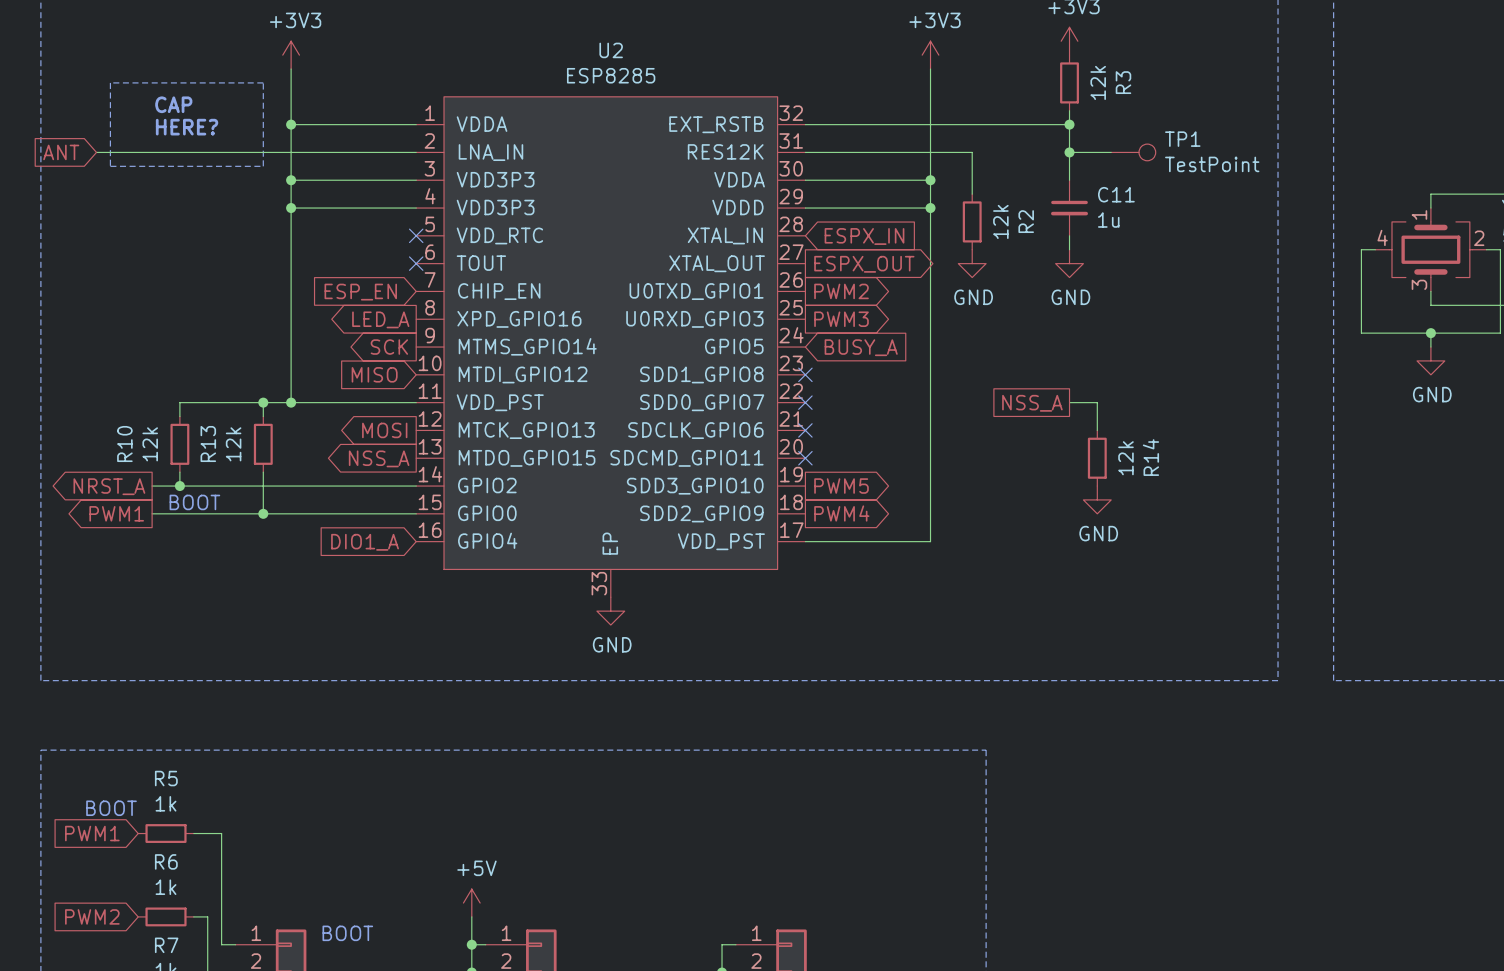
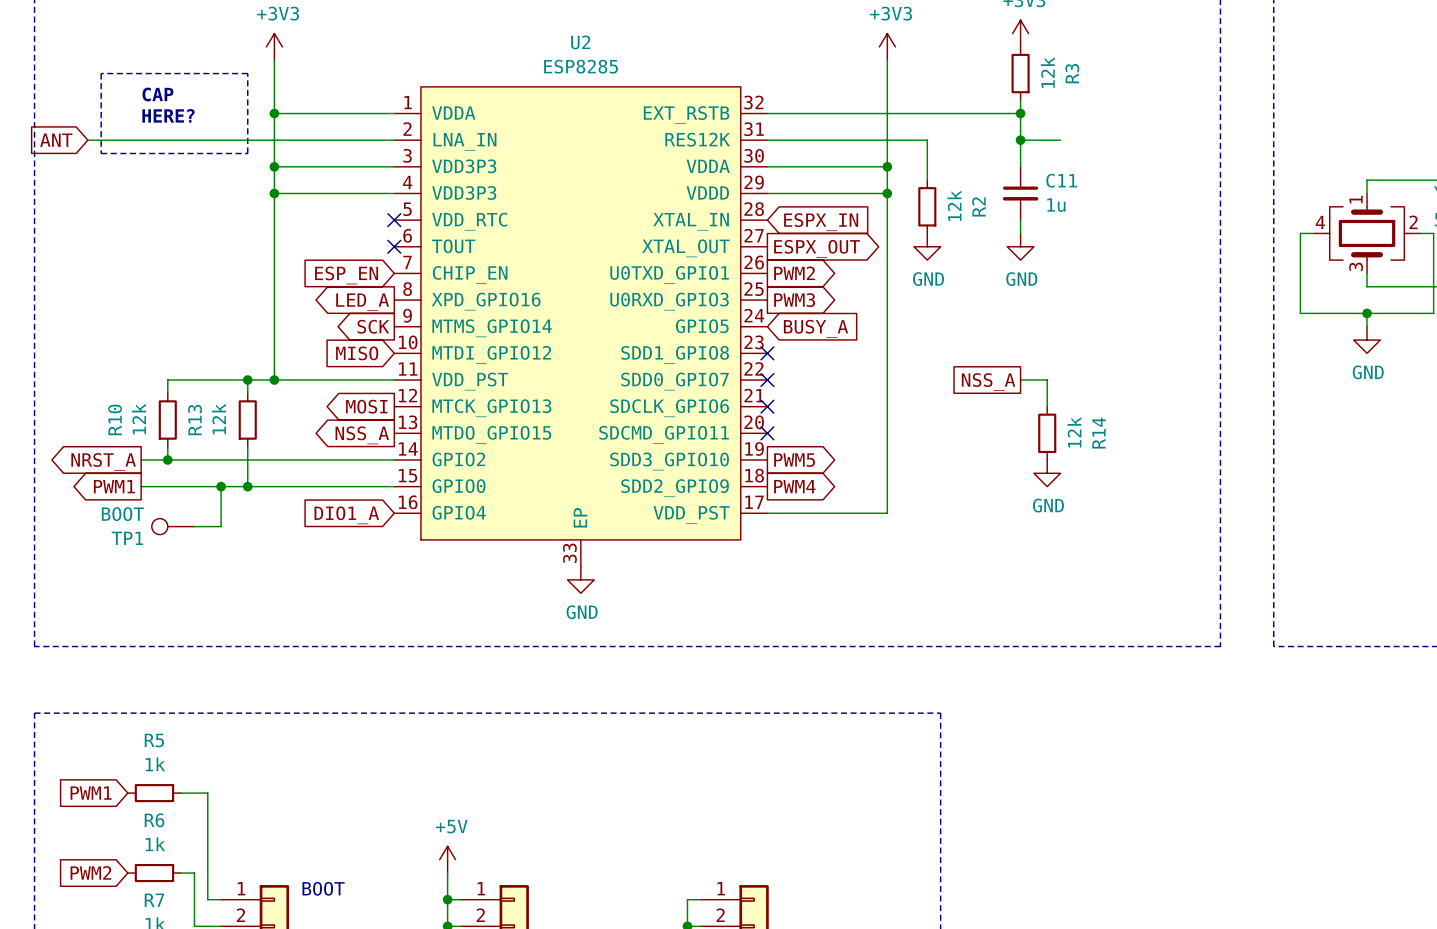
TP1 position: (1133, 152) -> (173, 526)
TP1 rotation: 0° (1147, 152) -> 180° (159, 526)
TP1 value: TestPoint (1212, 164) -> BOOT (122, 514)
text: BOOT (194, 502) -> none
wire: none -> (221, 486) (221, 526) (194, 526)
junction: none -> (221, 486)
text: BOOT (111, 808) -> none

